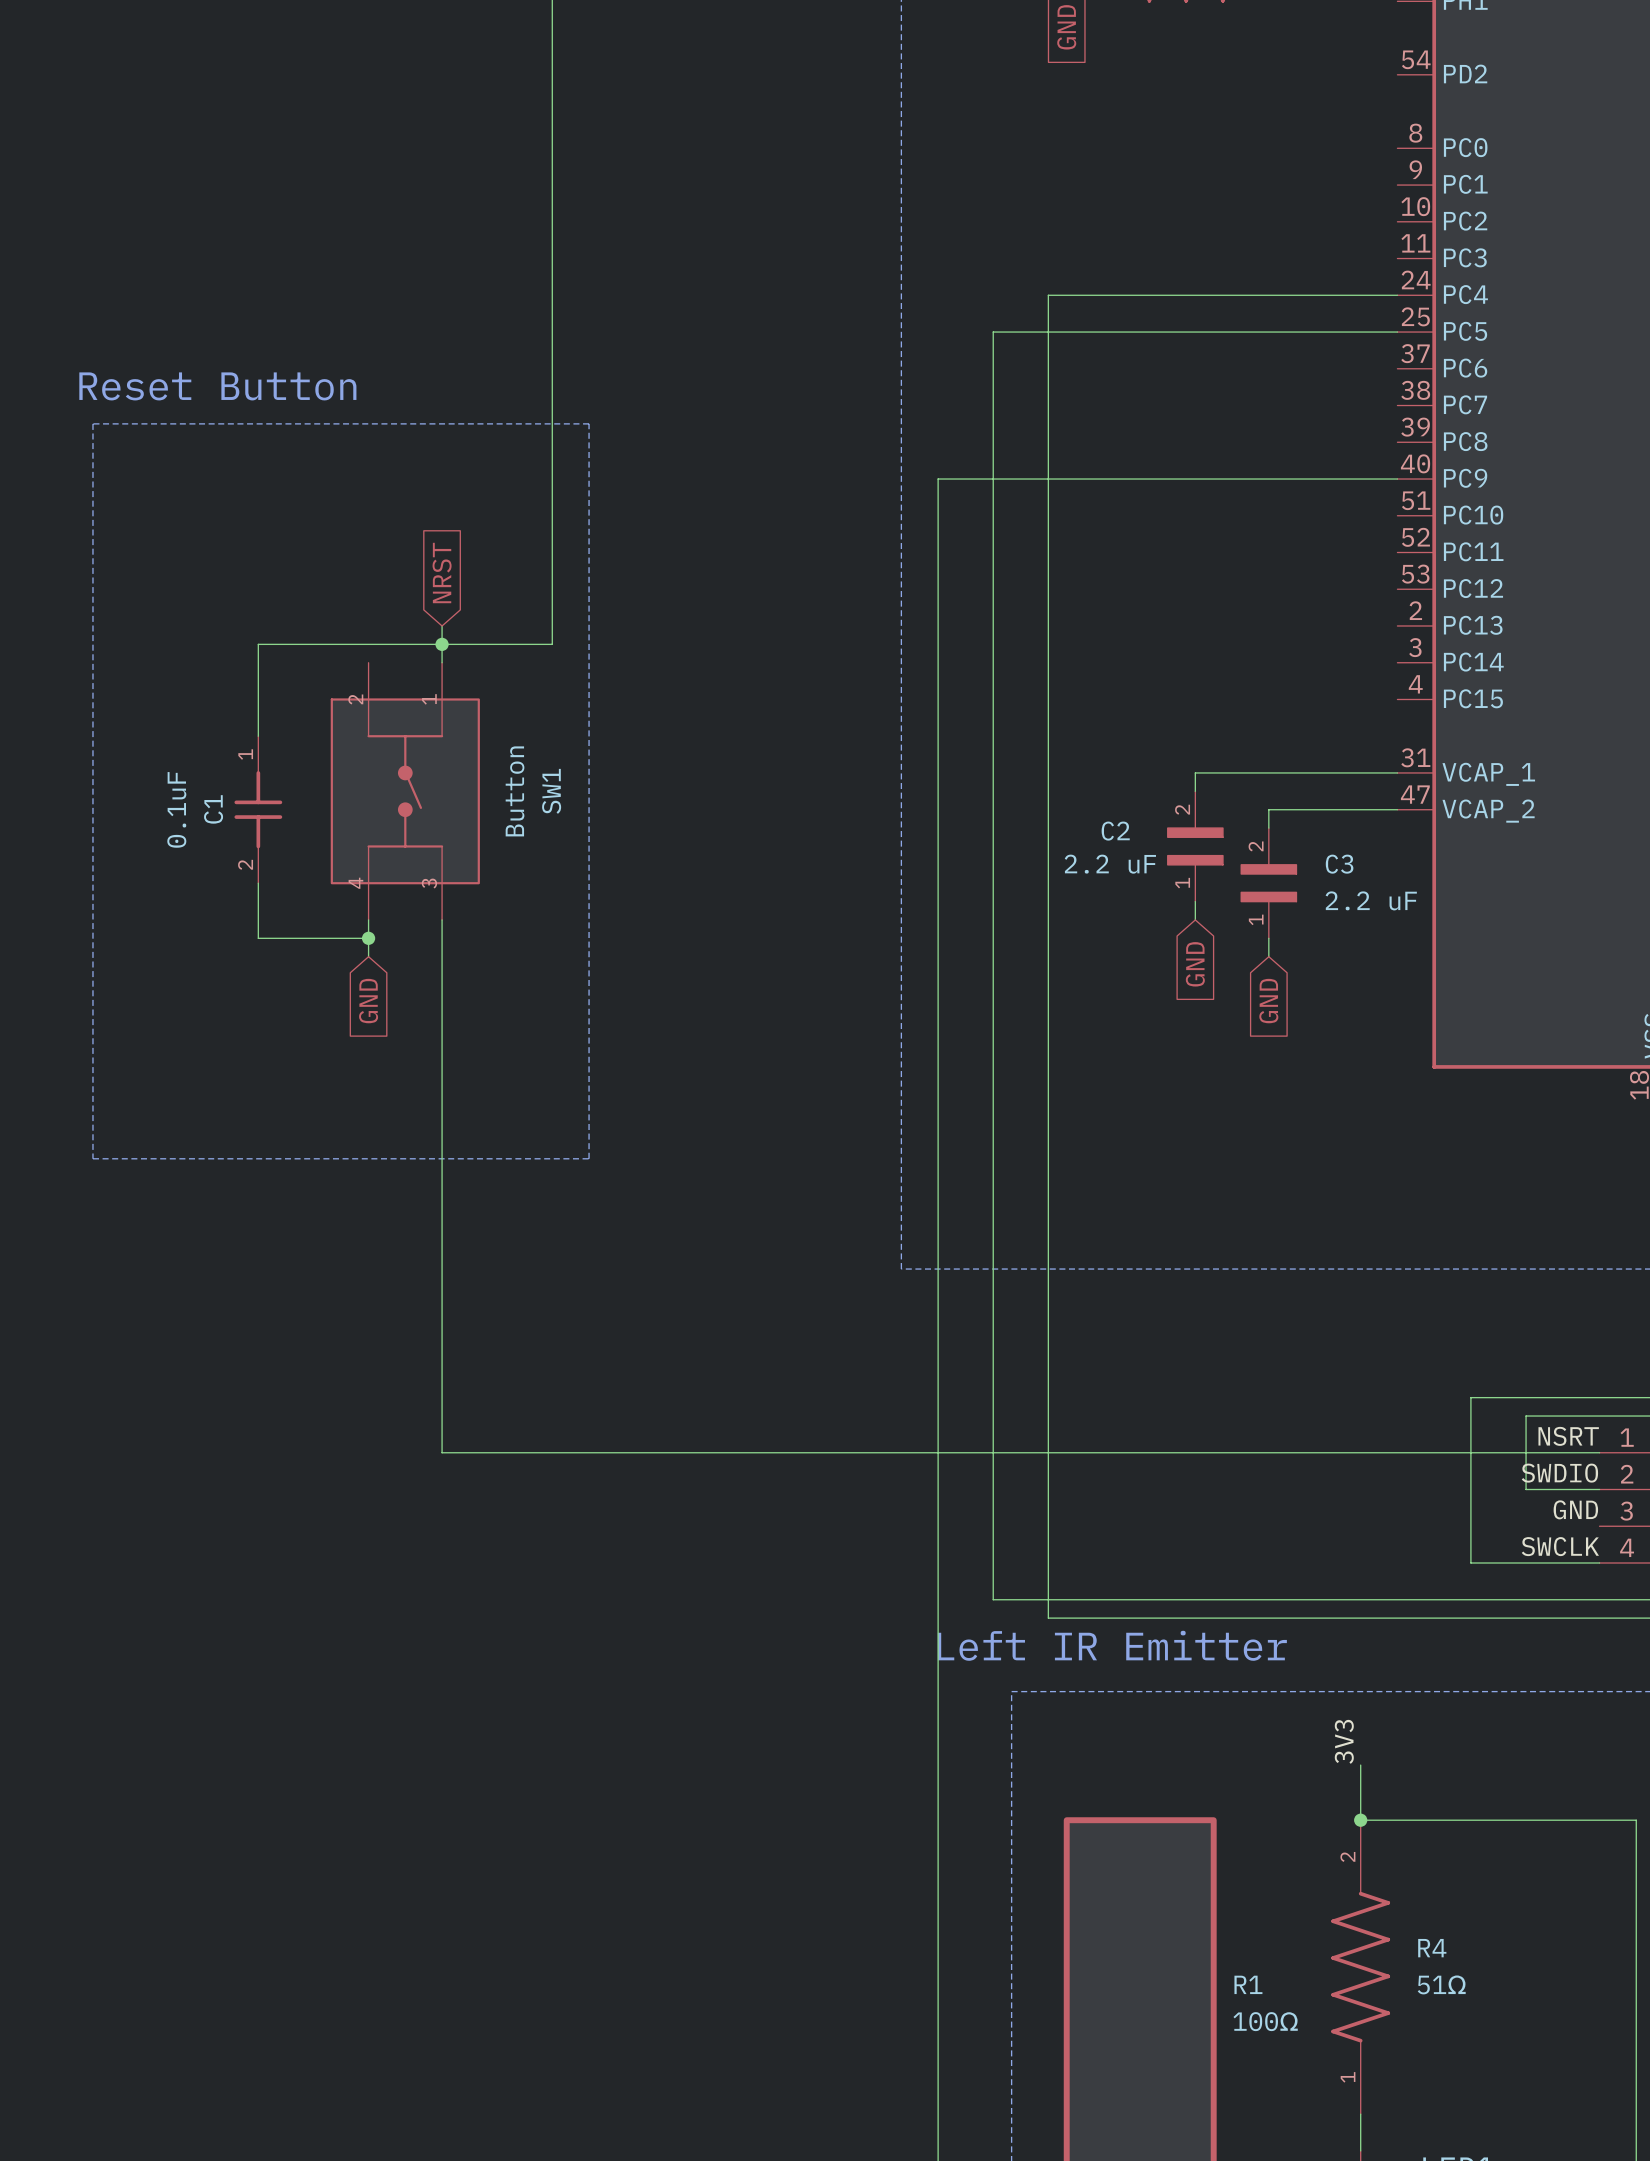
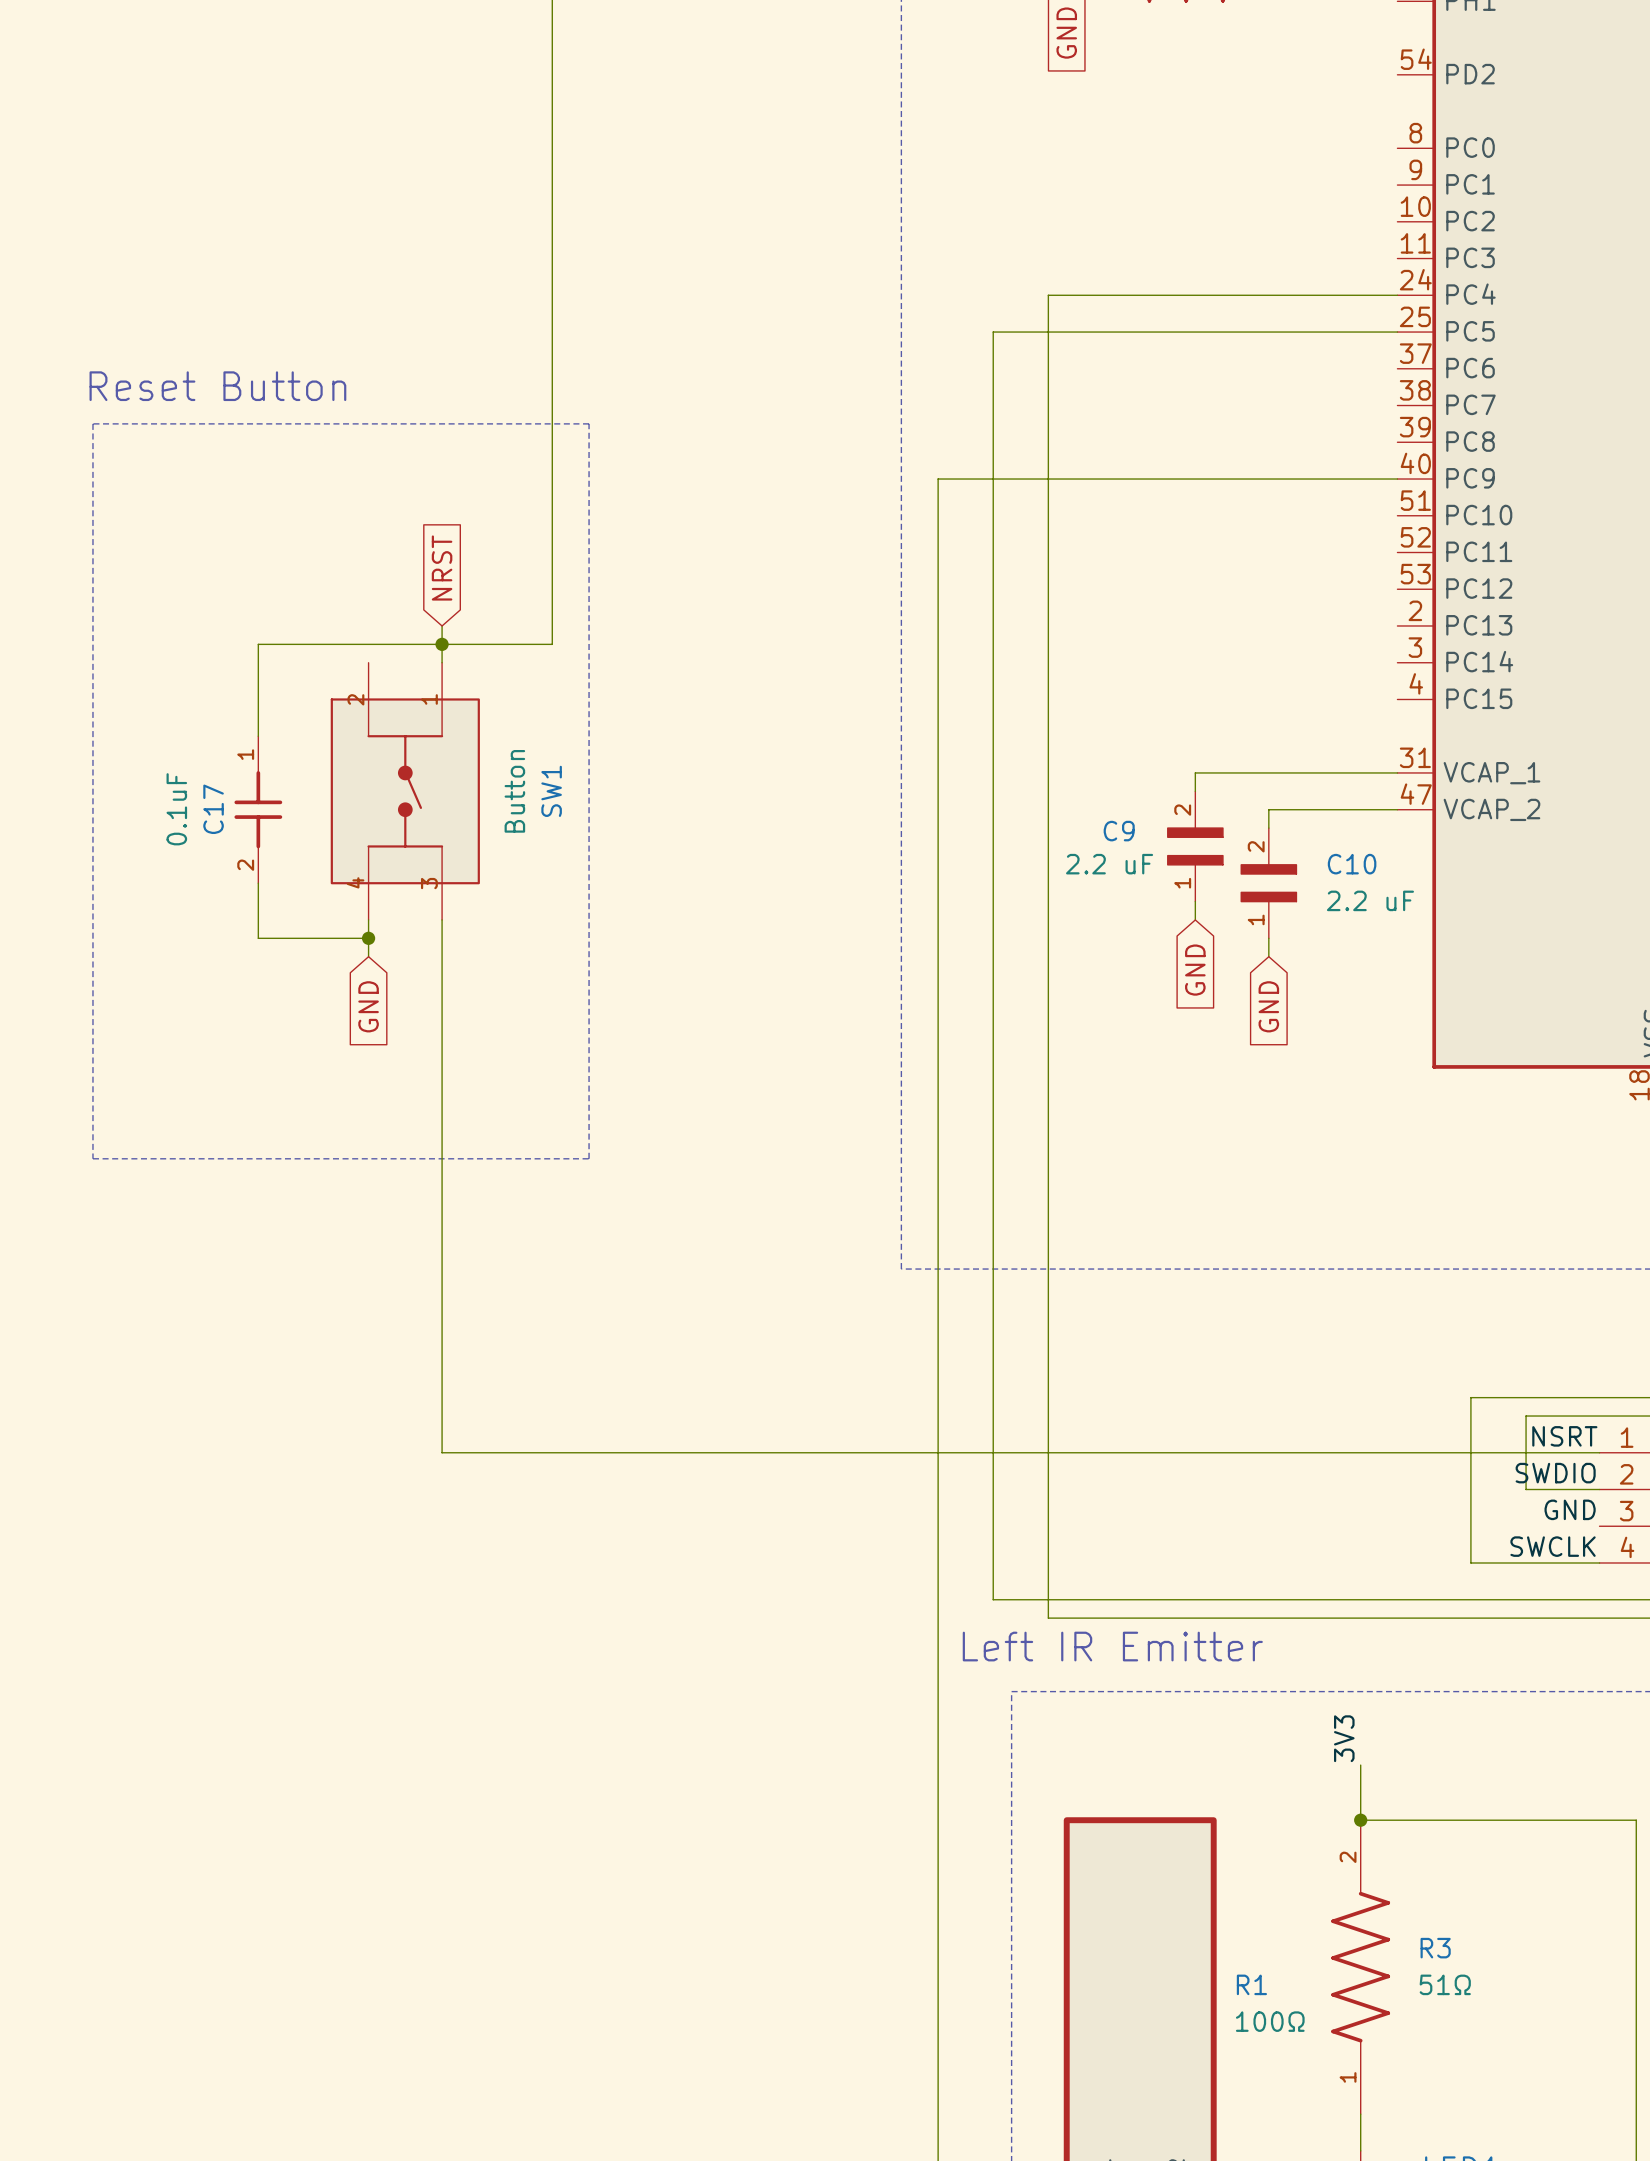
C1 name: C1 (213, 809) -> C17 (213, 809)
C2 name: C2 (1115, 831) -> C9 (1119, 831)
C3 name: C3 (1339, 864) -> C10 (1352, 864)
R4 name: R4 (1432, 1948) -> R3 (1435, 1948)

